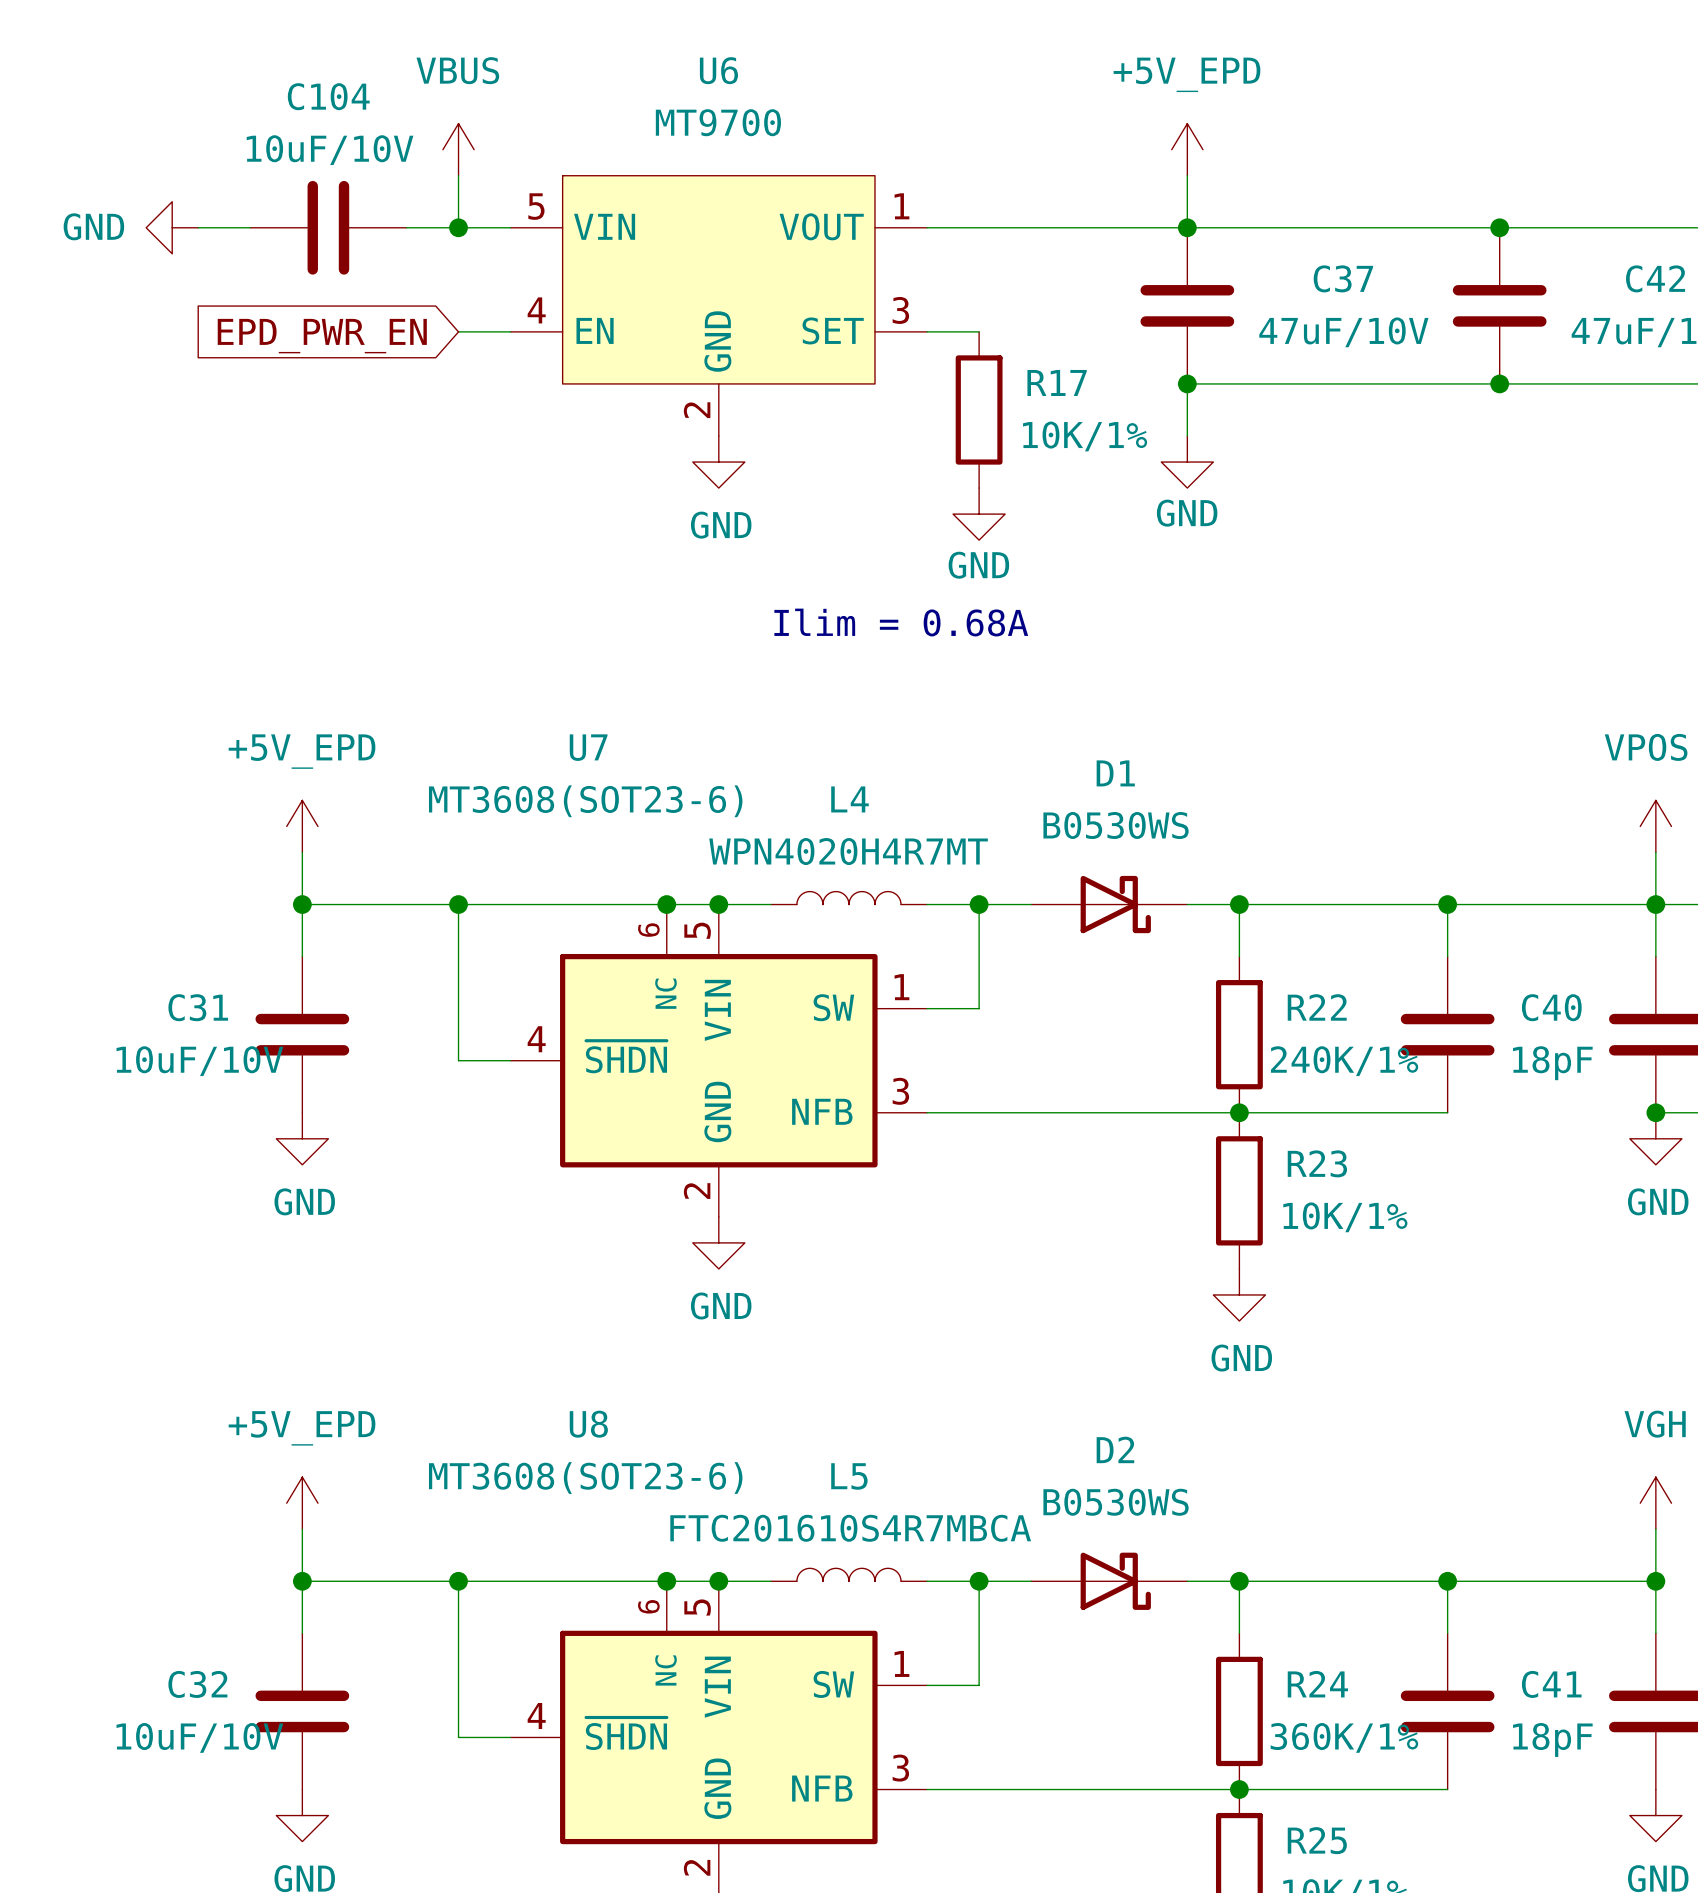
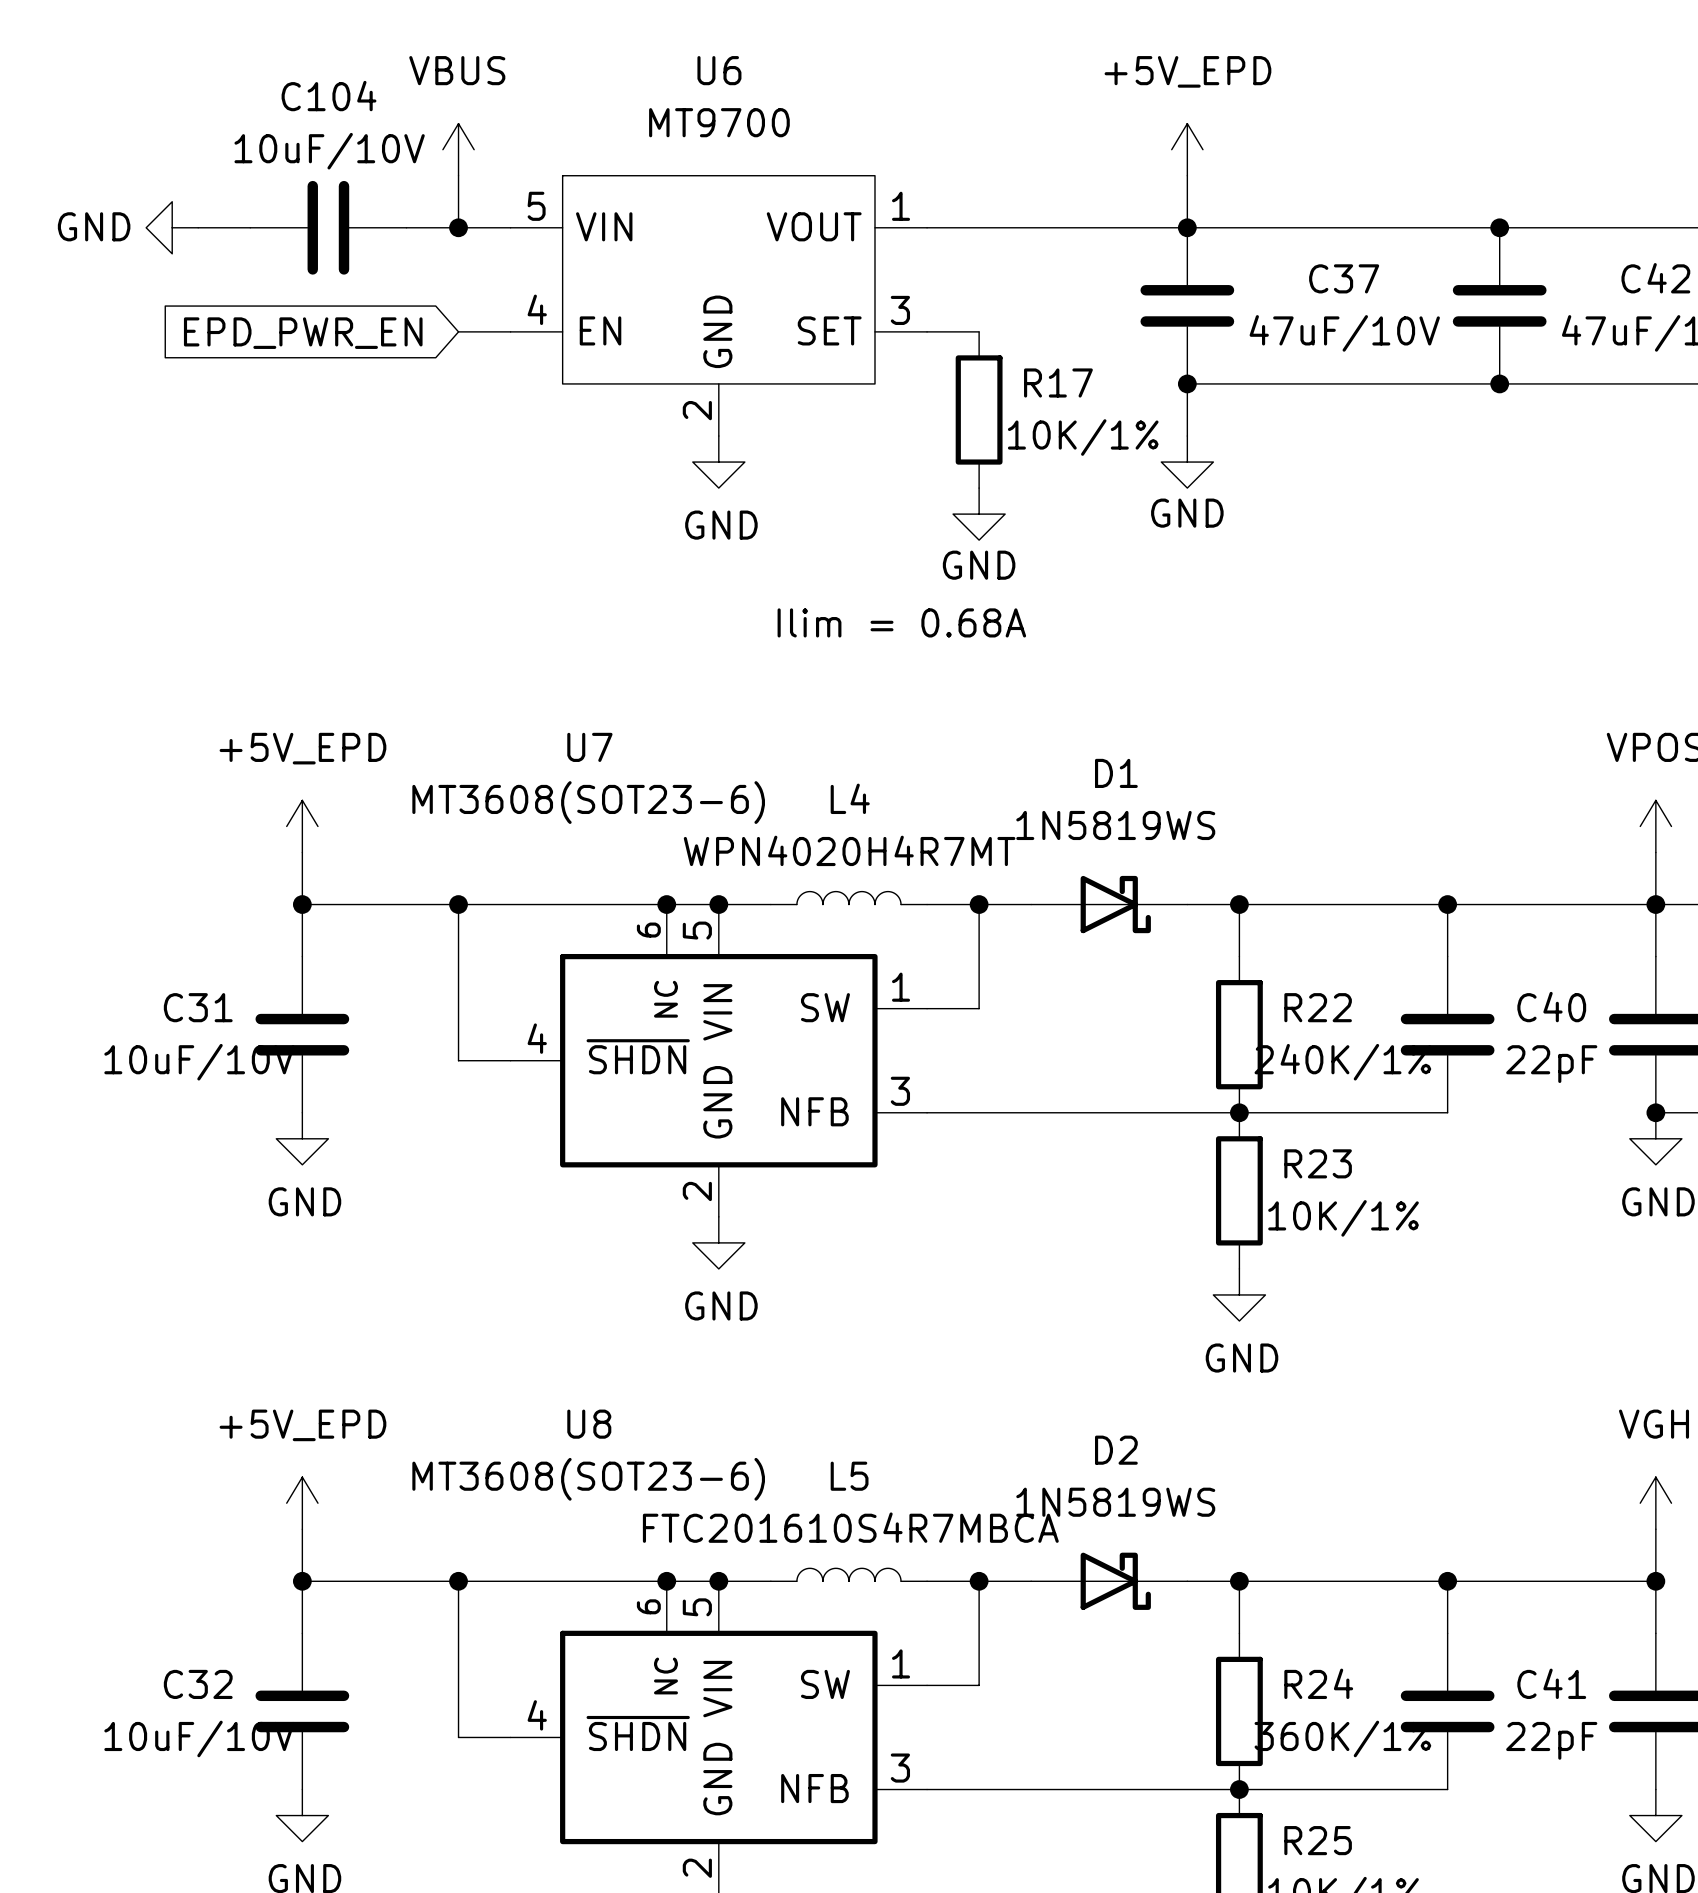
D1 value: B0530WS (1116, 825) -> 1N5819WS (1115, 825)
C40 value: 18pF (1552, 1063) -> 22pF (1551, 1064)
D2 value: B0530WS (1116, 1502) -> 1N5819WS (1115, 1502)
C41 value: 18pF (1552, 1739) -> 22pF (1551, 1740)

